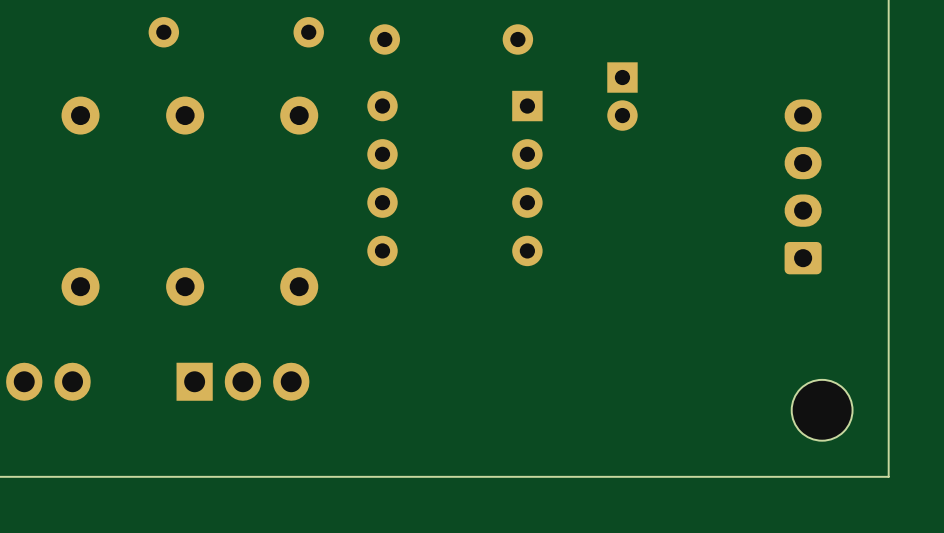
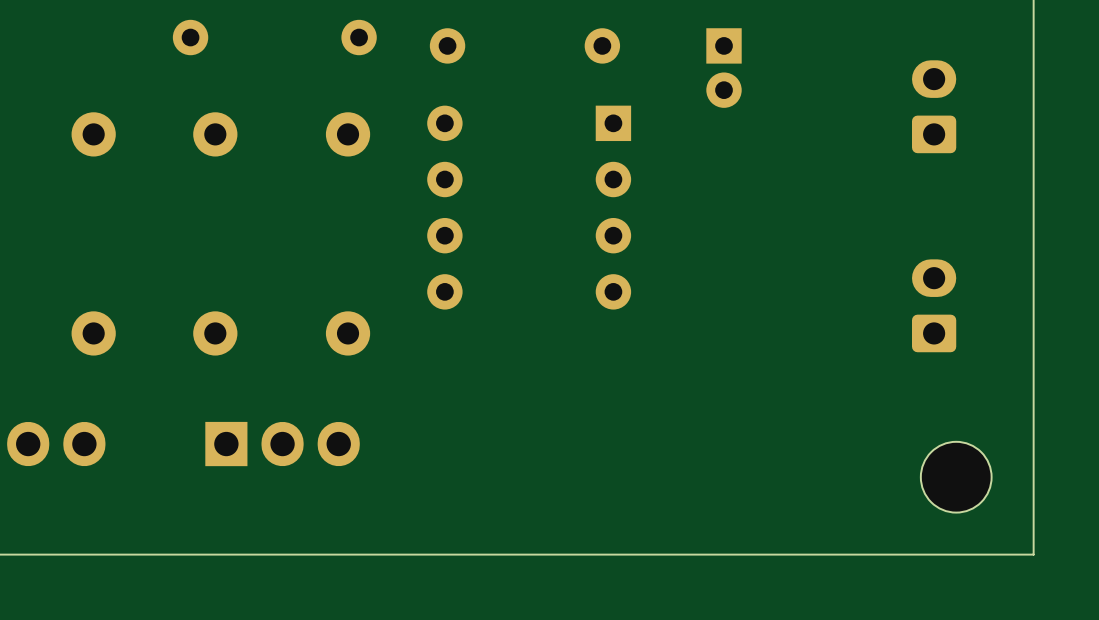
part: none -> (934, 106)
part position: (622, 96) -> (724, 68)
part: (803, 186) -> none
part: none -> (934, 305)

